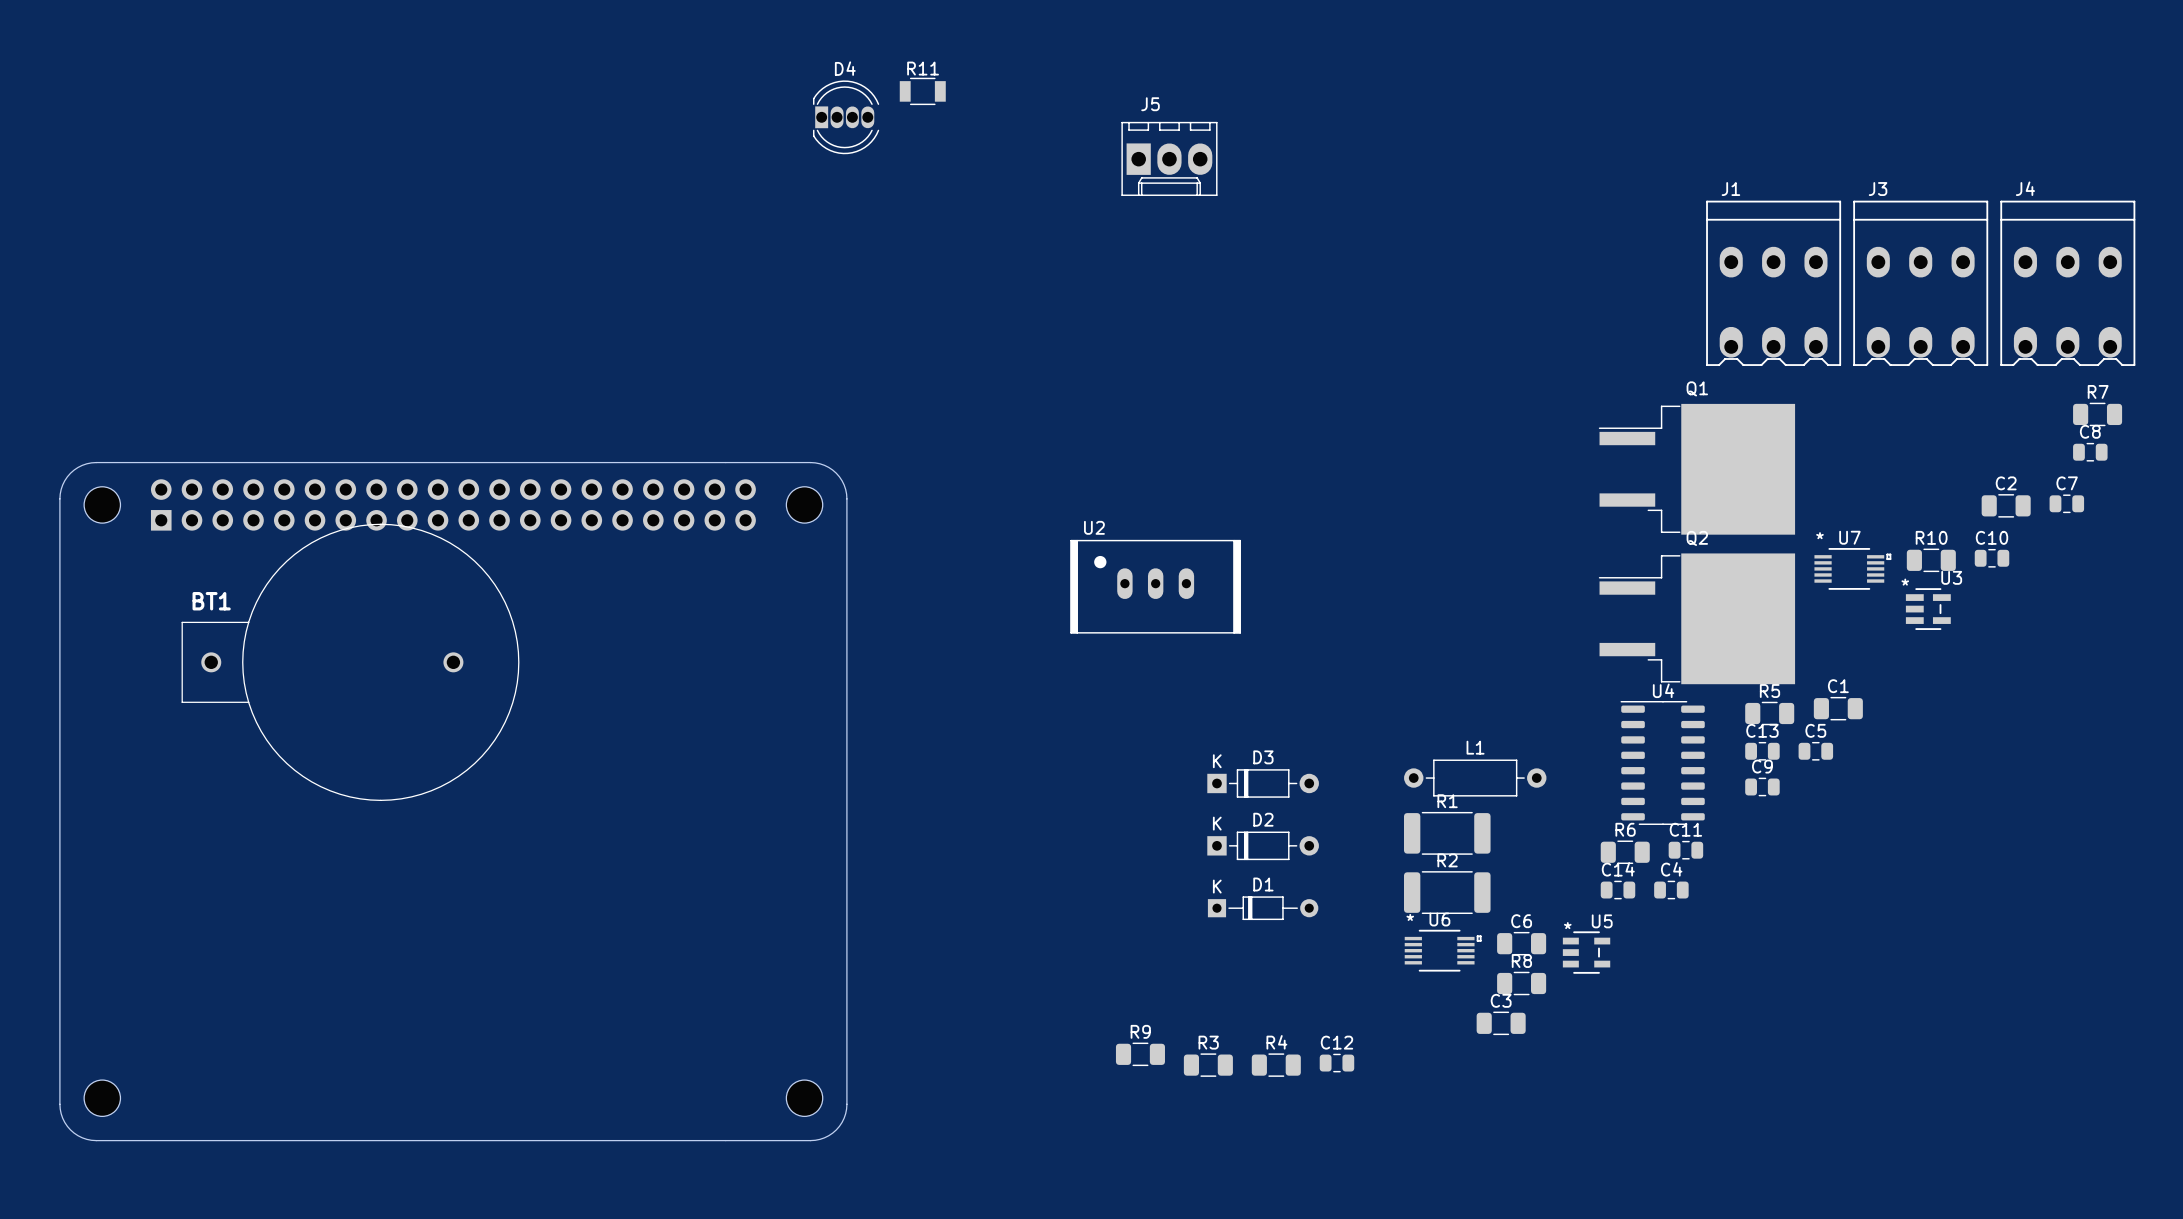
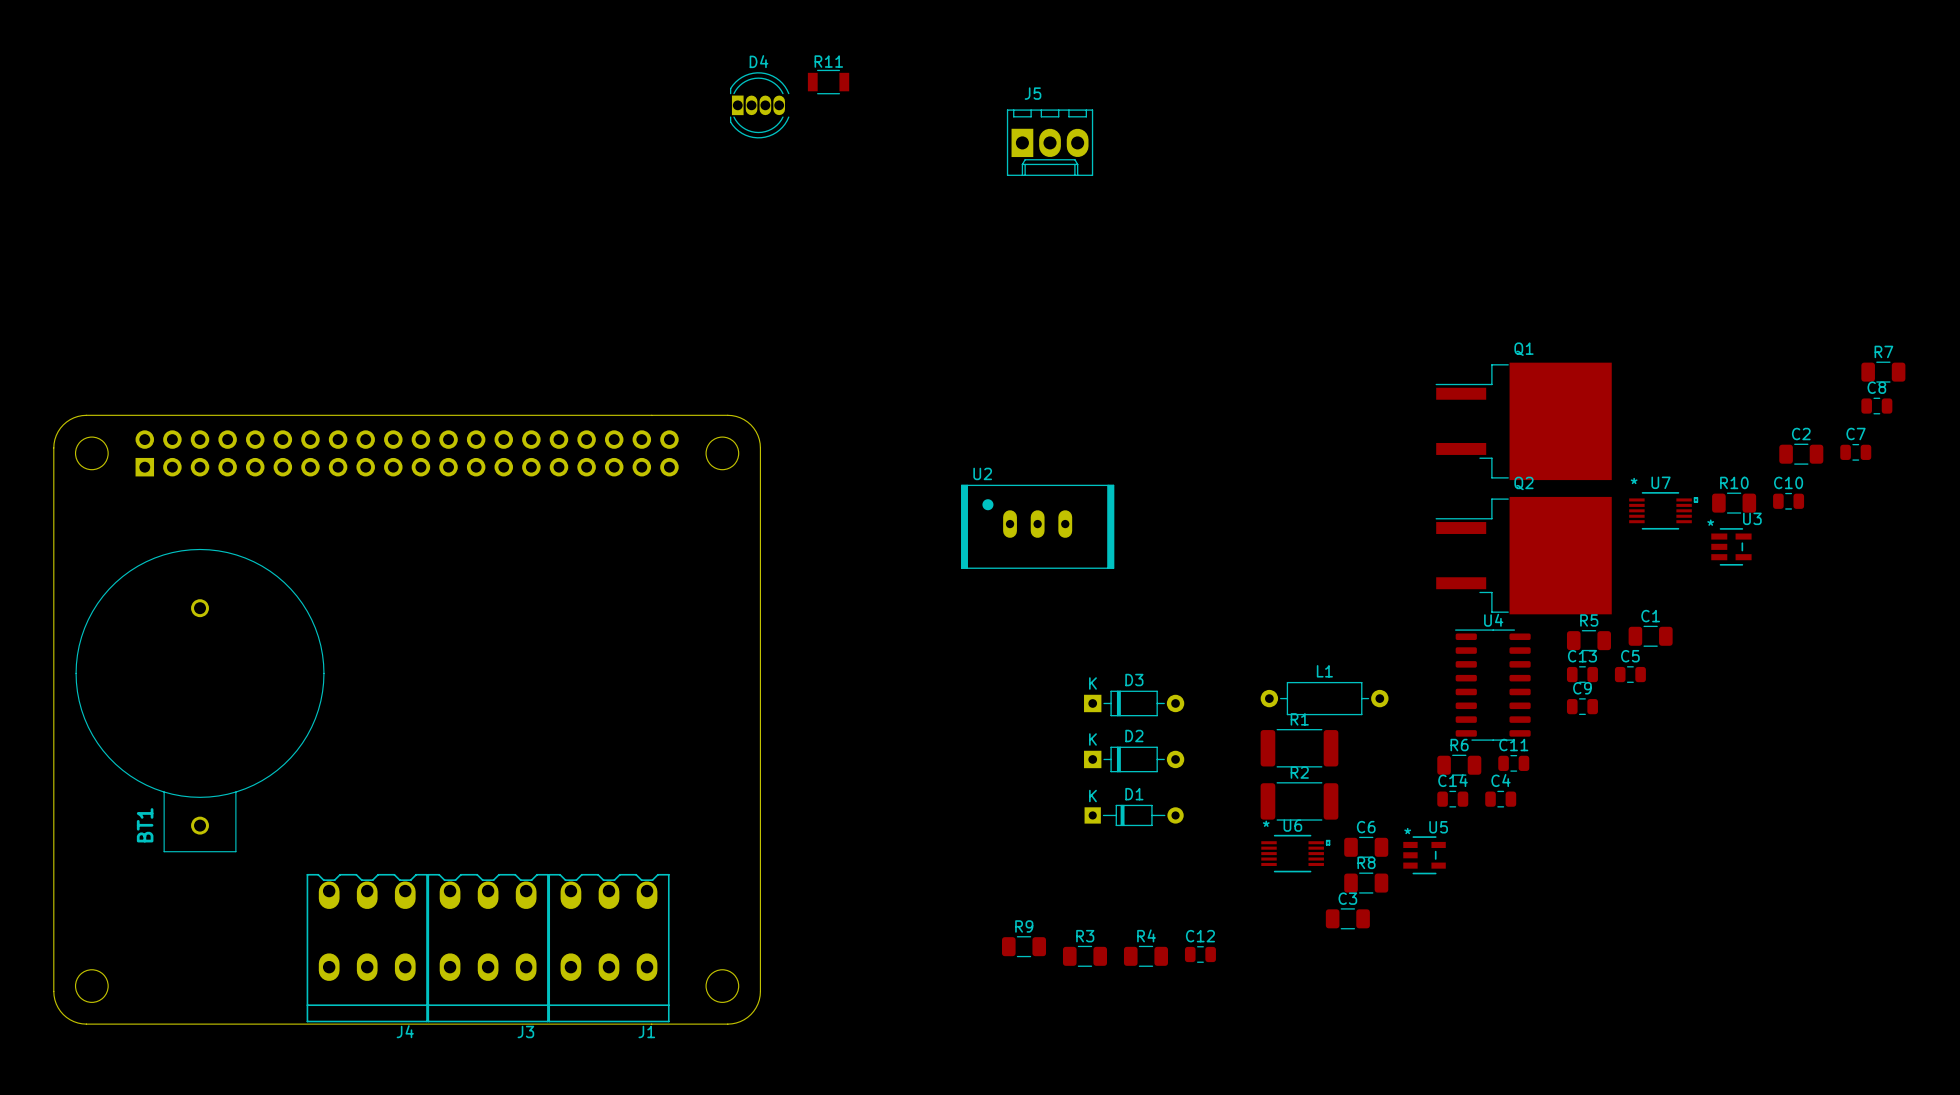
J1 rotation: 0° (1773, 283) -> 180° (608, 948)
J1 position: (1773, 283) -> (608, 948)
J3 rotation: 0° (1920, 283) -> 180° (488, 948)
J3 position: (1920, 283) -> (488, 948)
J4 rotation: 0° (2067, 283) -> 180° (367, 948)
J4 position: (2067, 283) -> (367, 948)
BT1 rotation: 0° (350, 662) -> 90° counterclockwise (200, 700)

